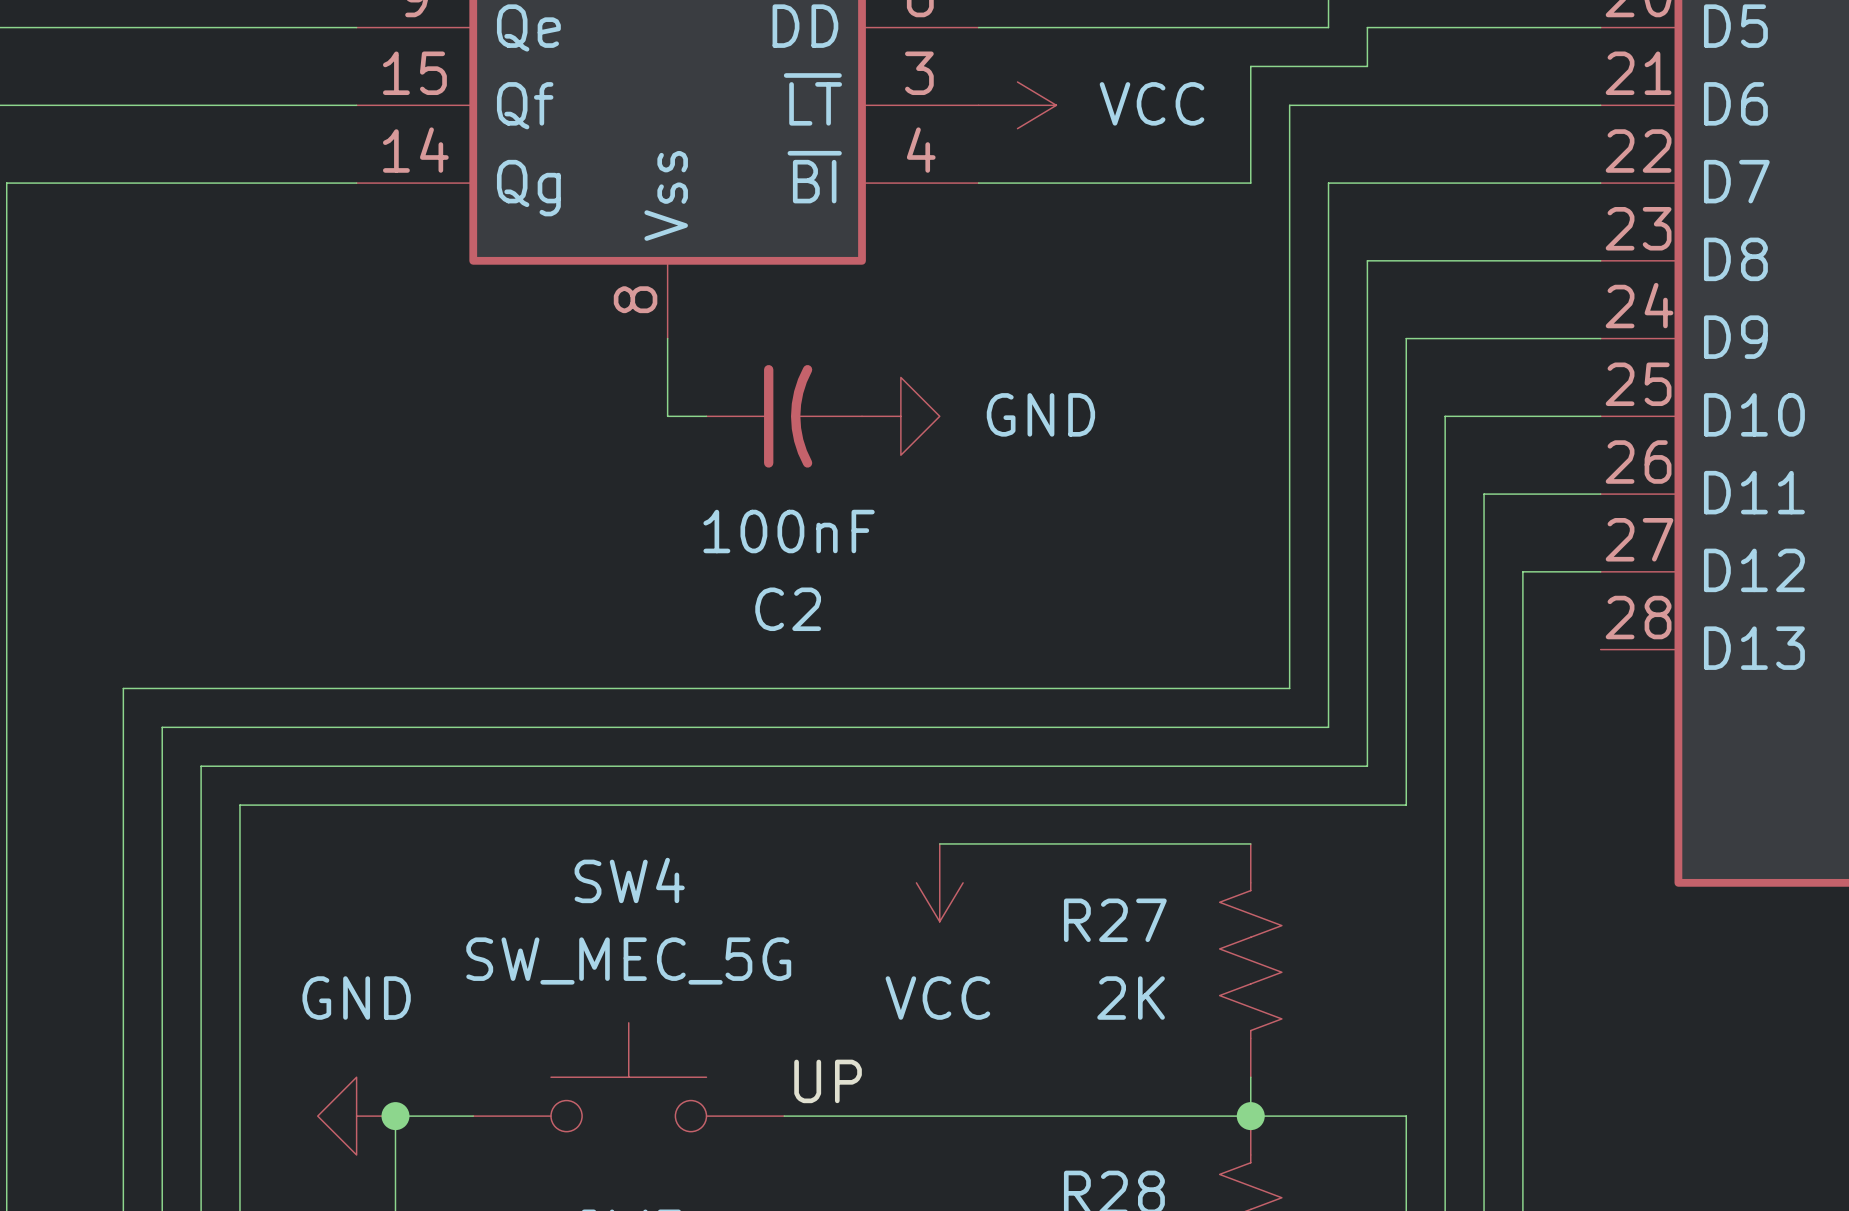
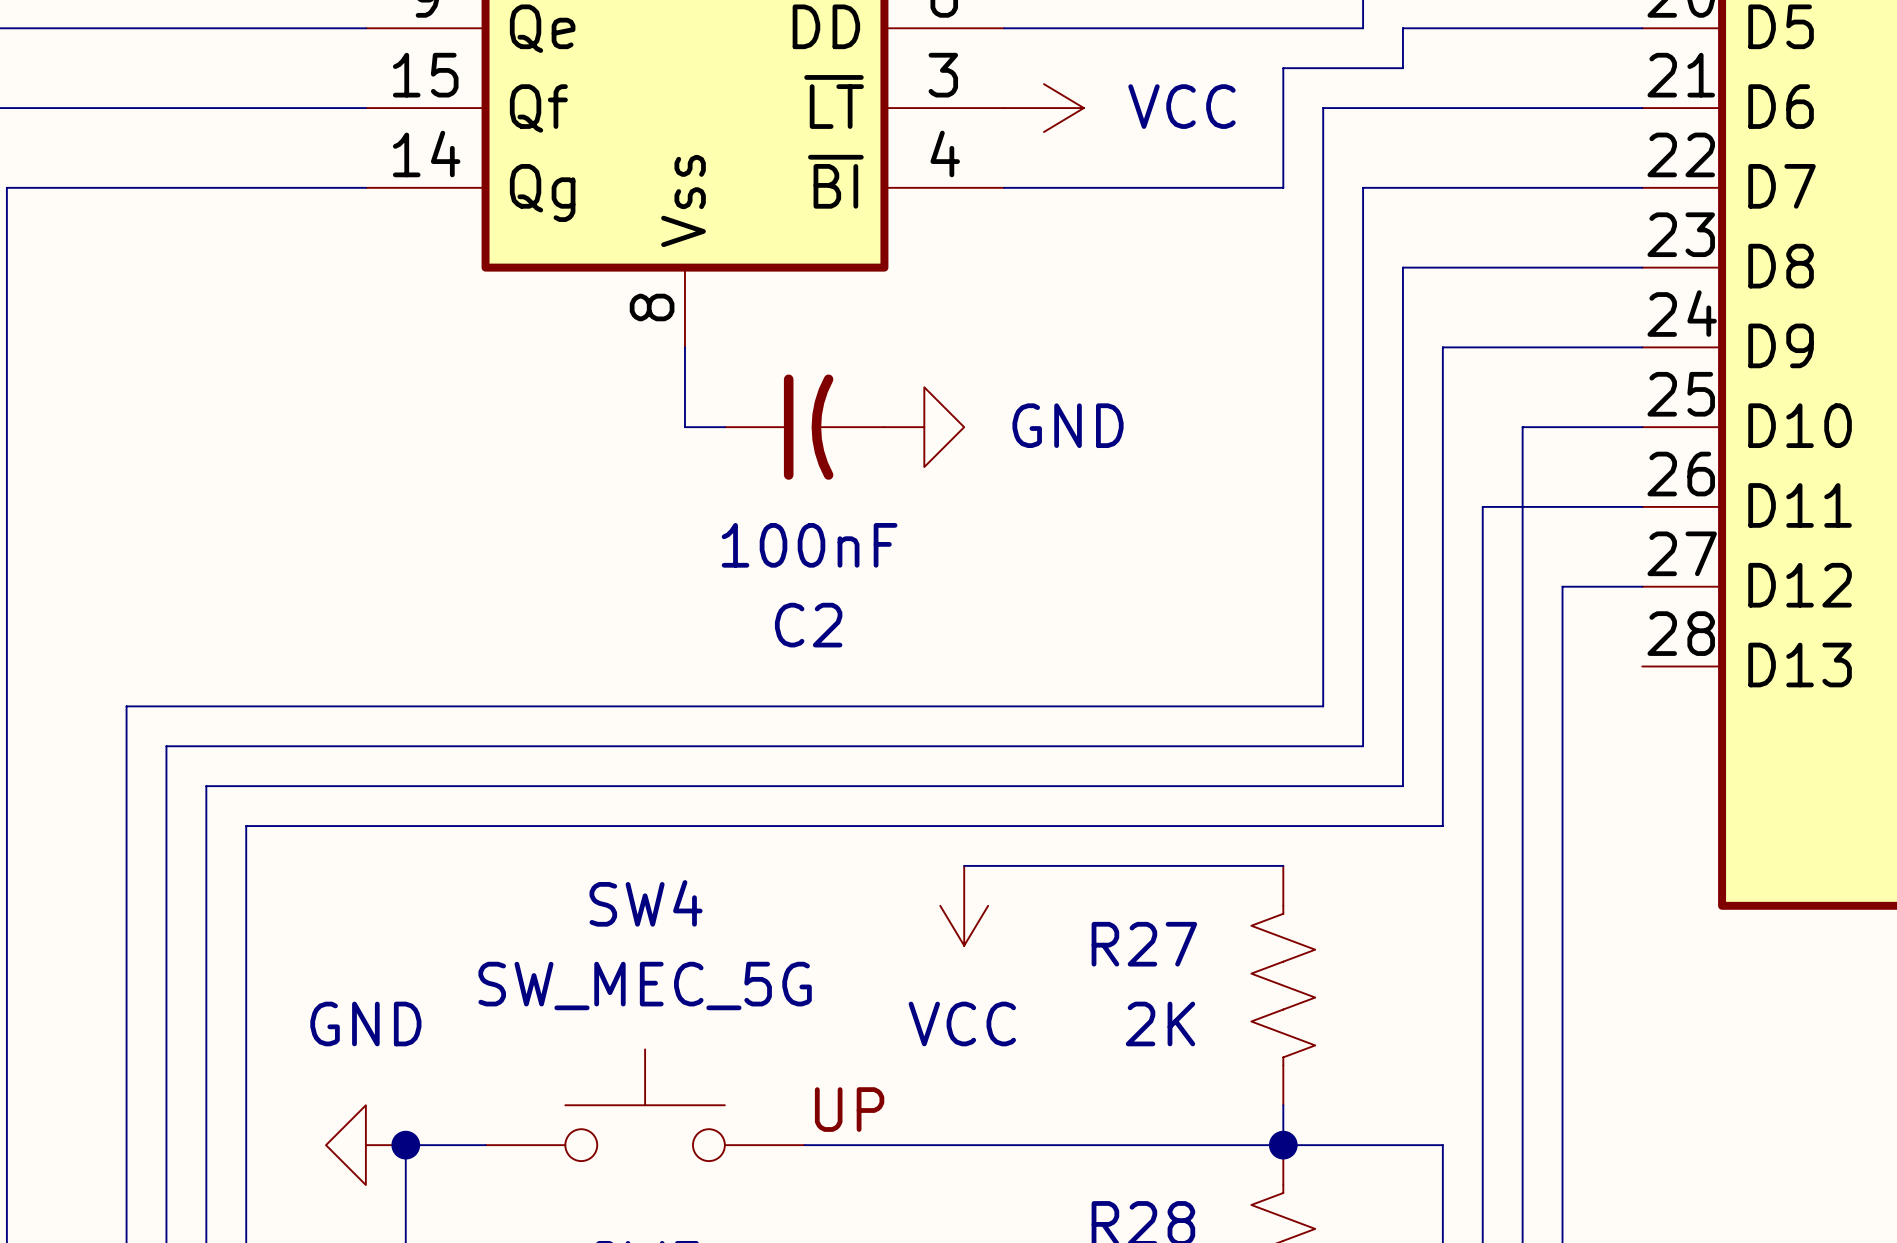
wire: (1484, 416) (1445, 416) (1445, 494) -> (1522, 427) (1522, 506) (1482, 506)

